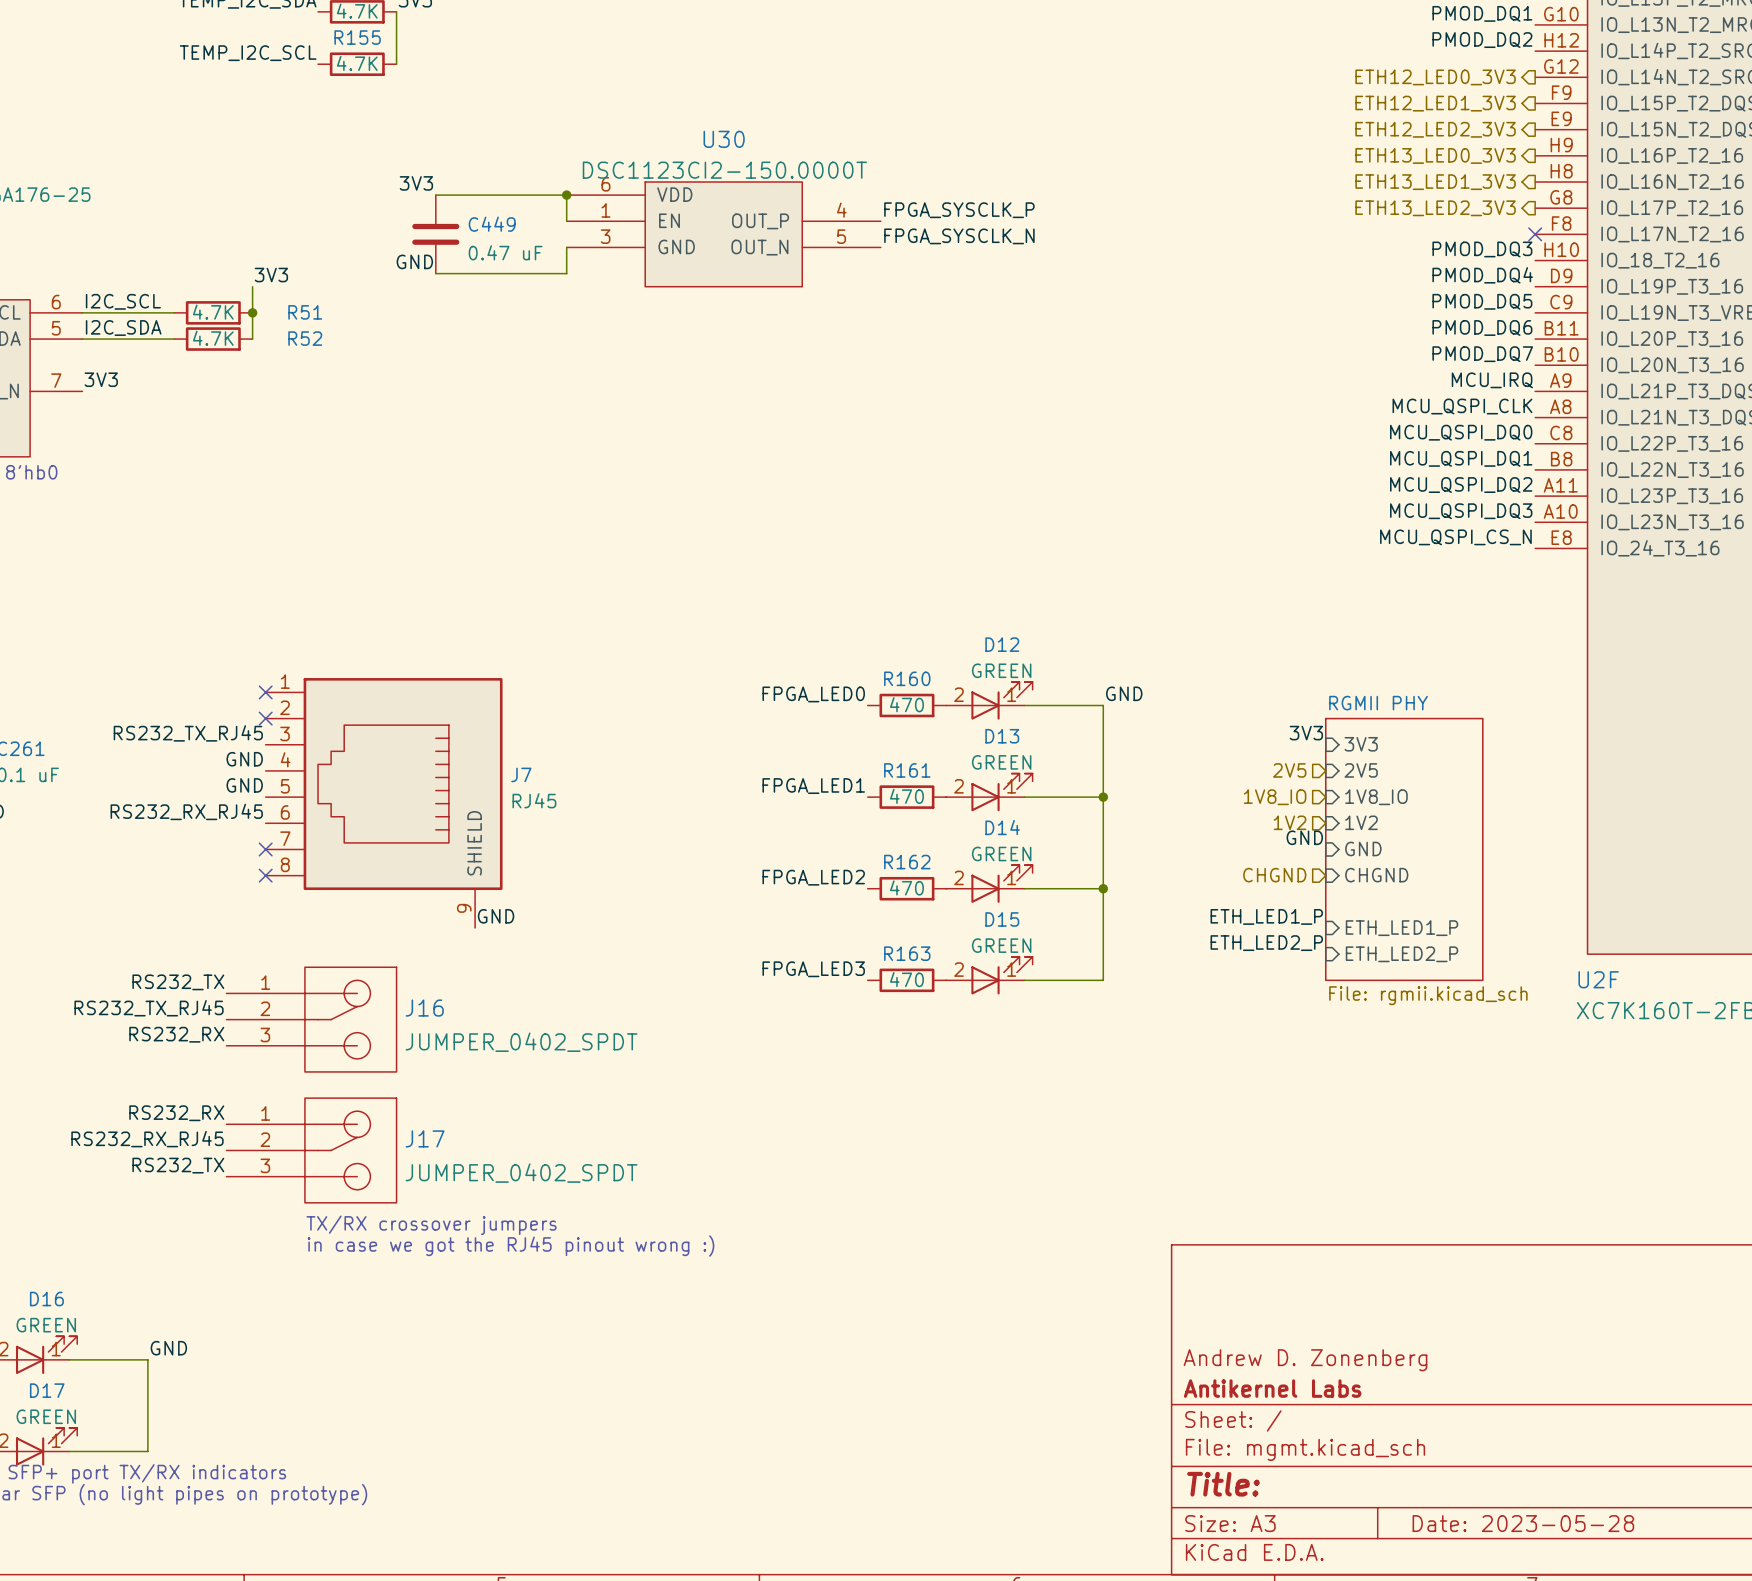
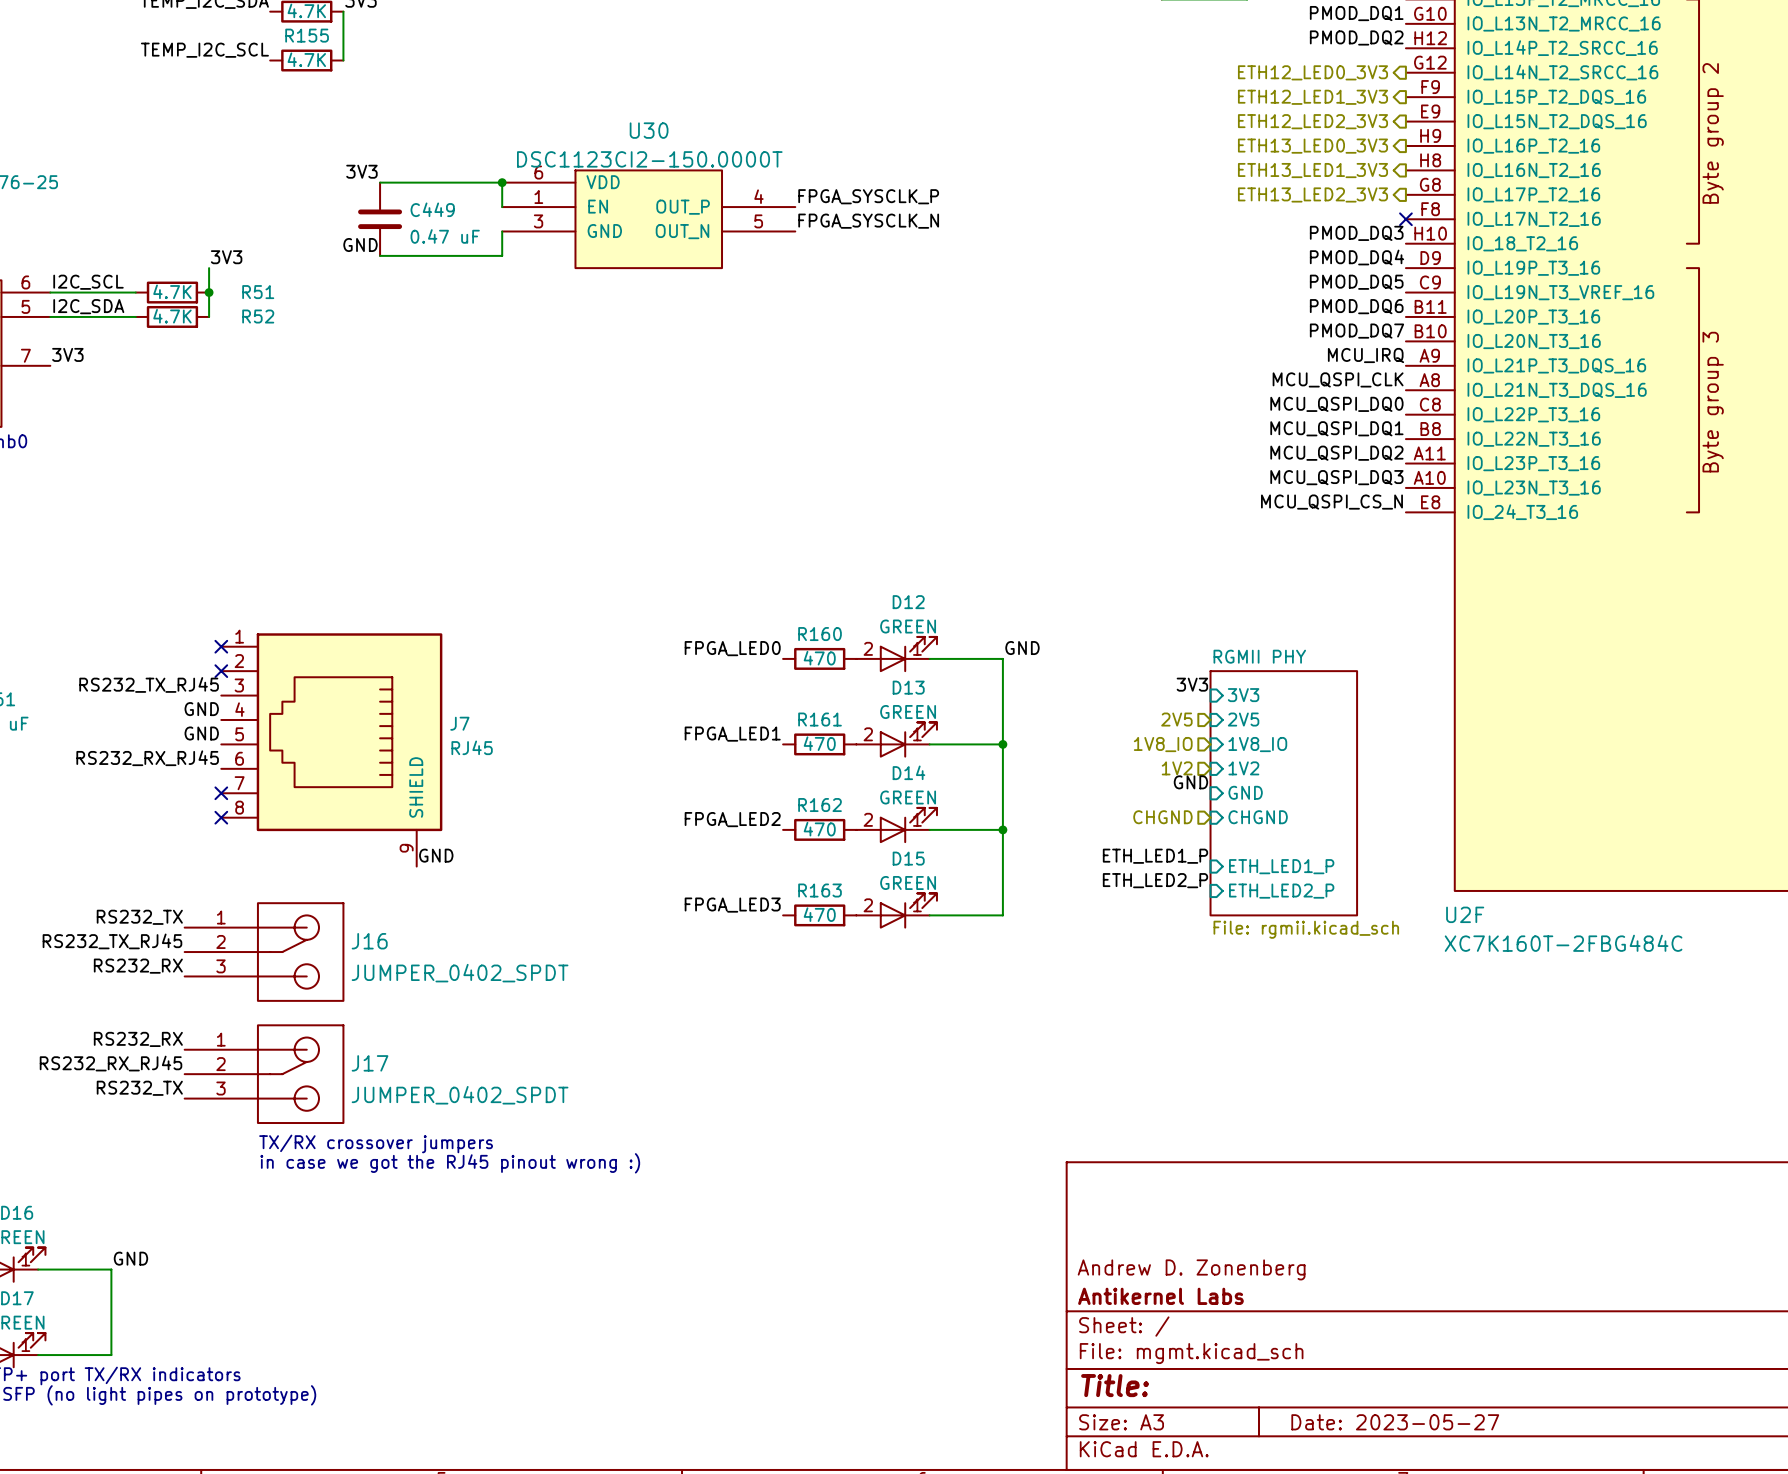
title block: Date: 2023-05-28 (1523, 1523) -> Date: 2023-05-27 (1395, 1422)

